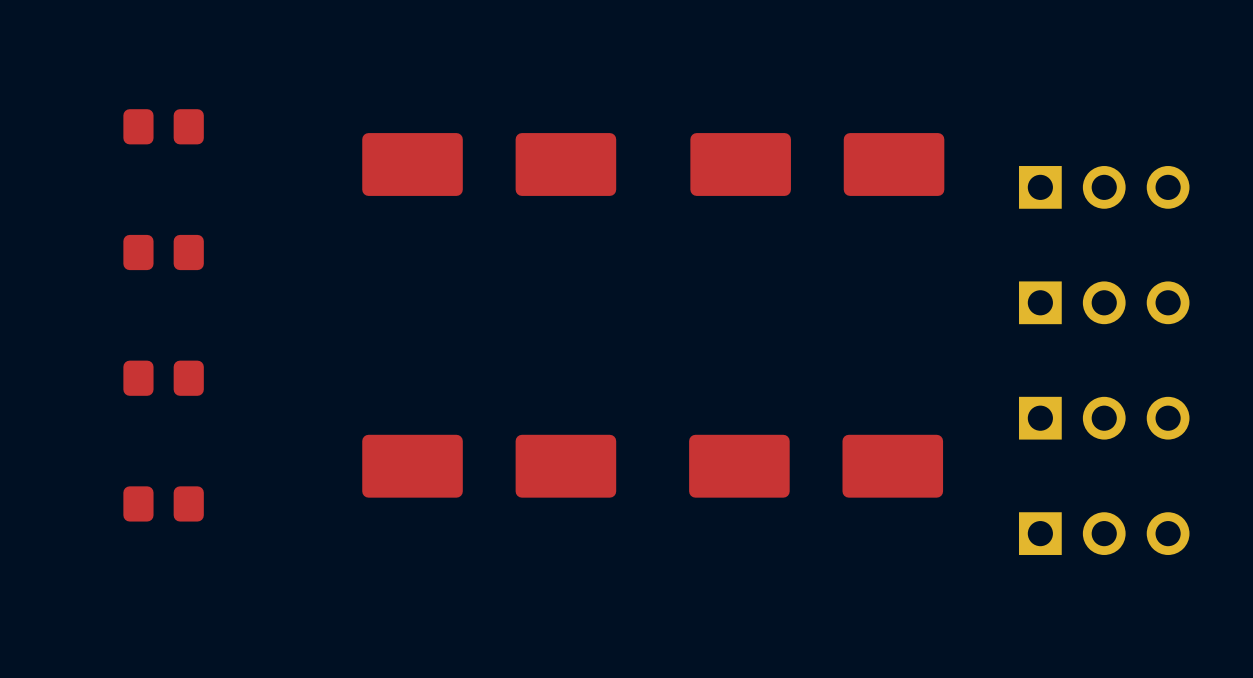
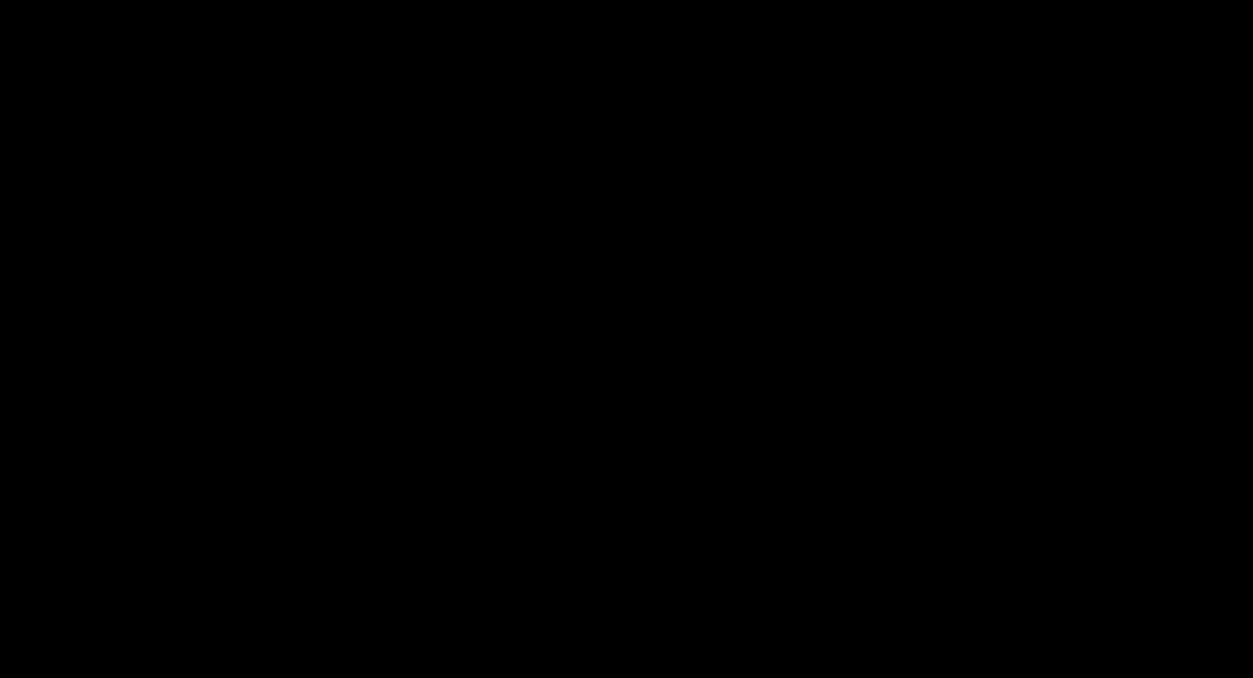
part: (163, 126) -> none
part: (489, 164) -> none
part: (817, 164) -> none
part: (1104, 187) -> none
part: (163, 252) -> none
part: (1104, 302) -> none
part: (163, 378) -> none
part: (1104, 418) -> none
part: (489, 466) -> none
part: (816, 466) -> none
part: (163, 503) -> none
part: (1104, 533) -> none

